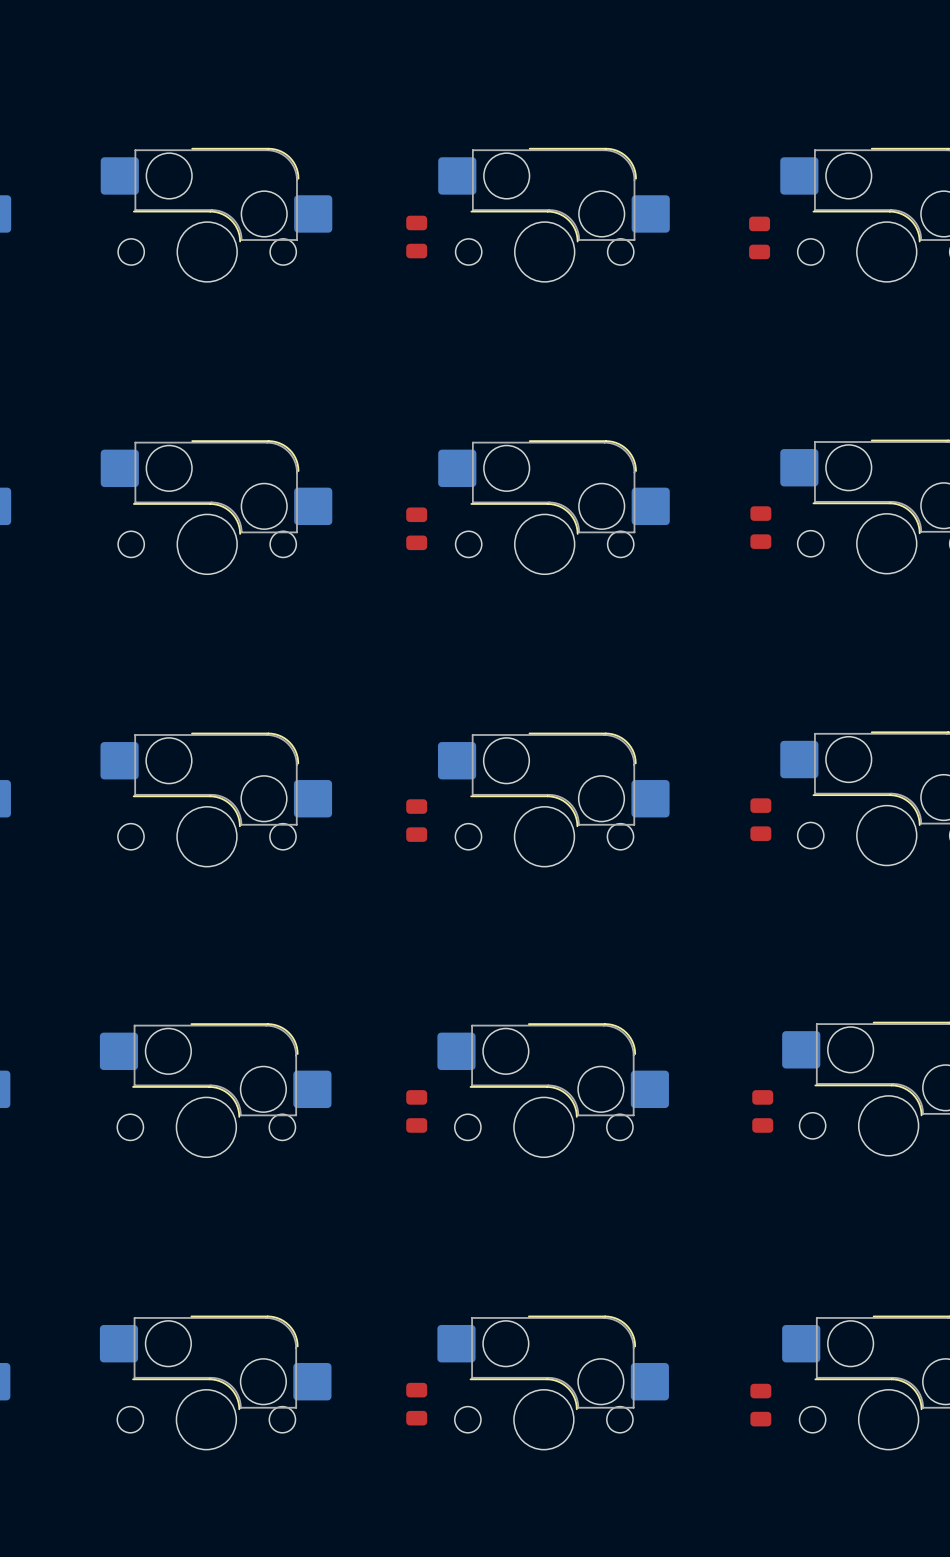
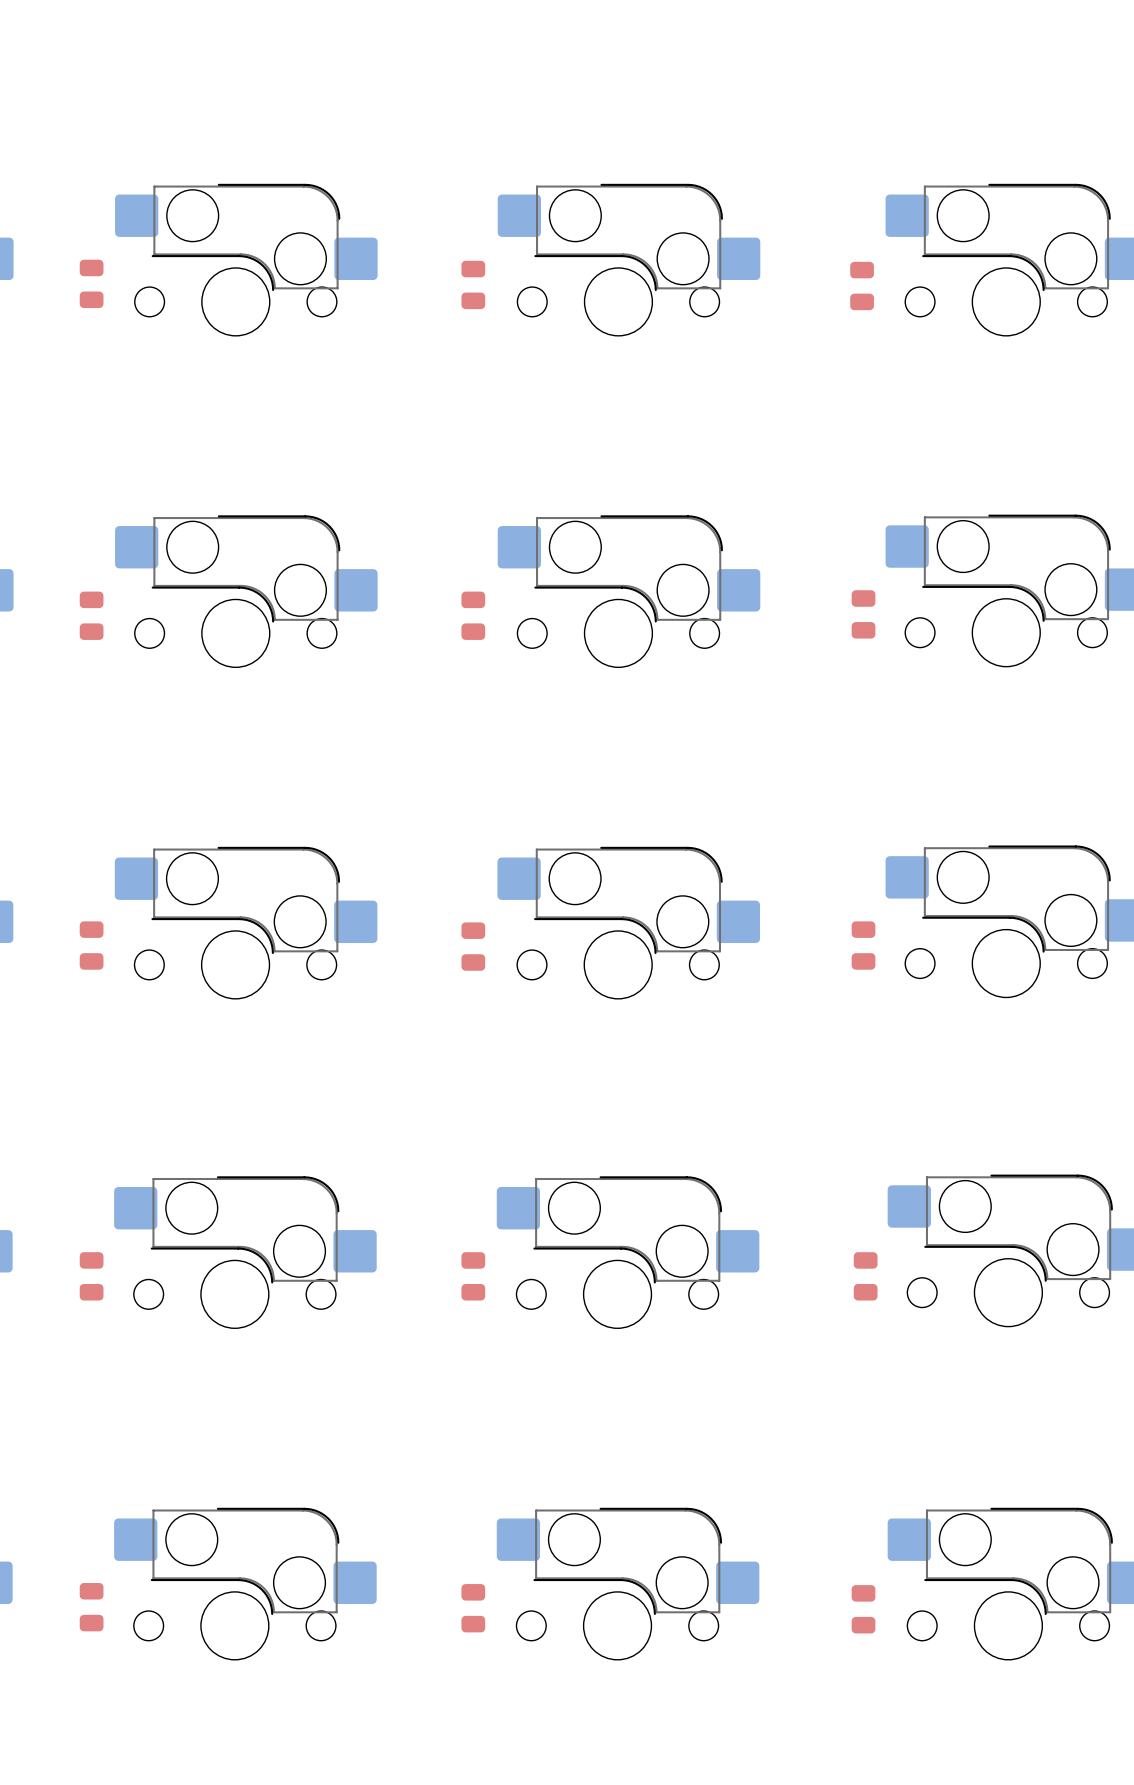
part: none -> (91, 283)
part: none -> (91, 615)
part: none -> (91, 945)
part: none -> (91, 1276)
part: none -> (91, 1607)

